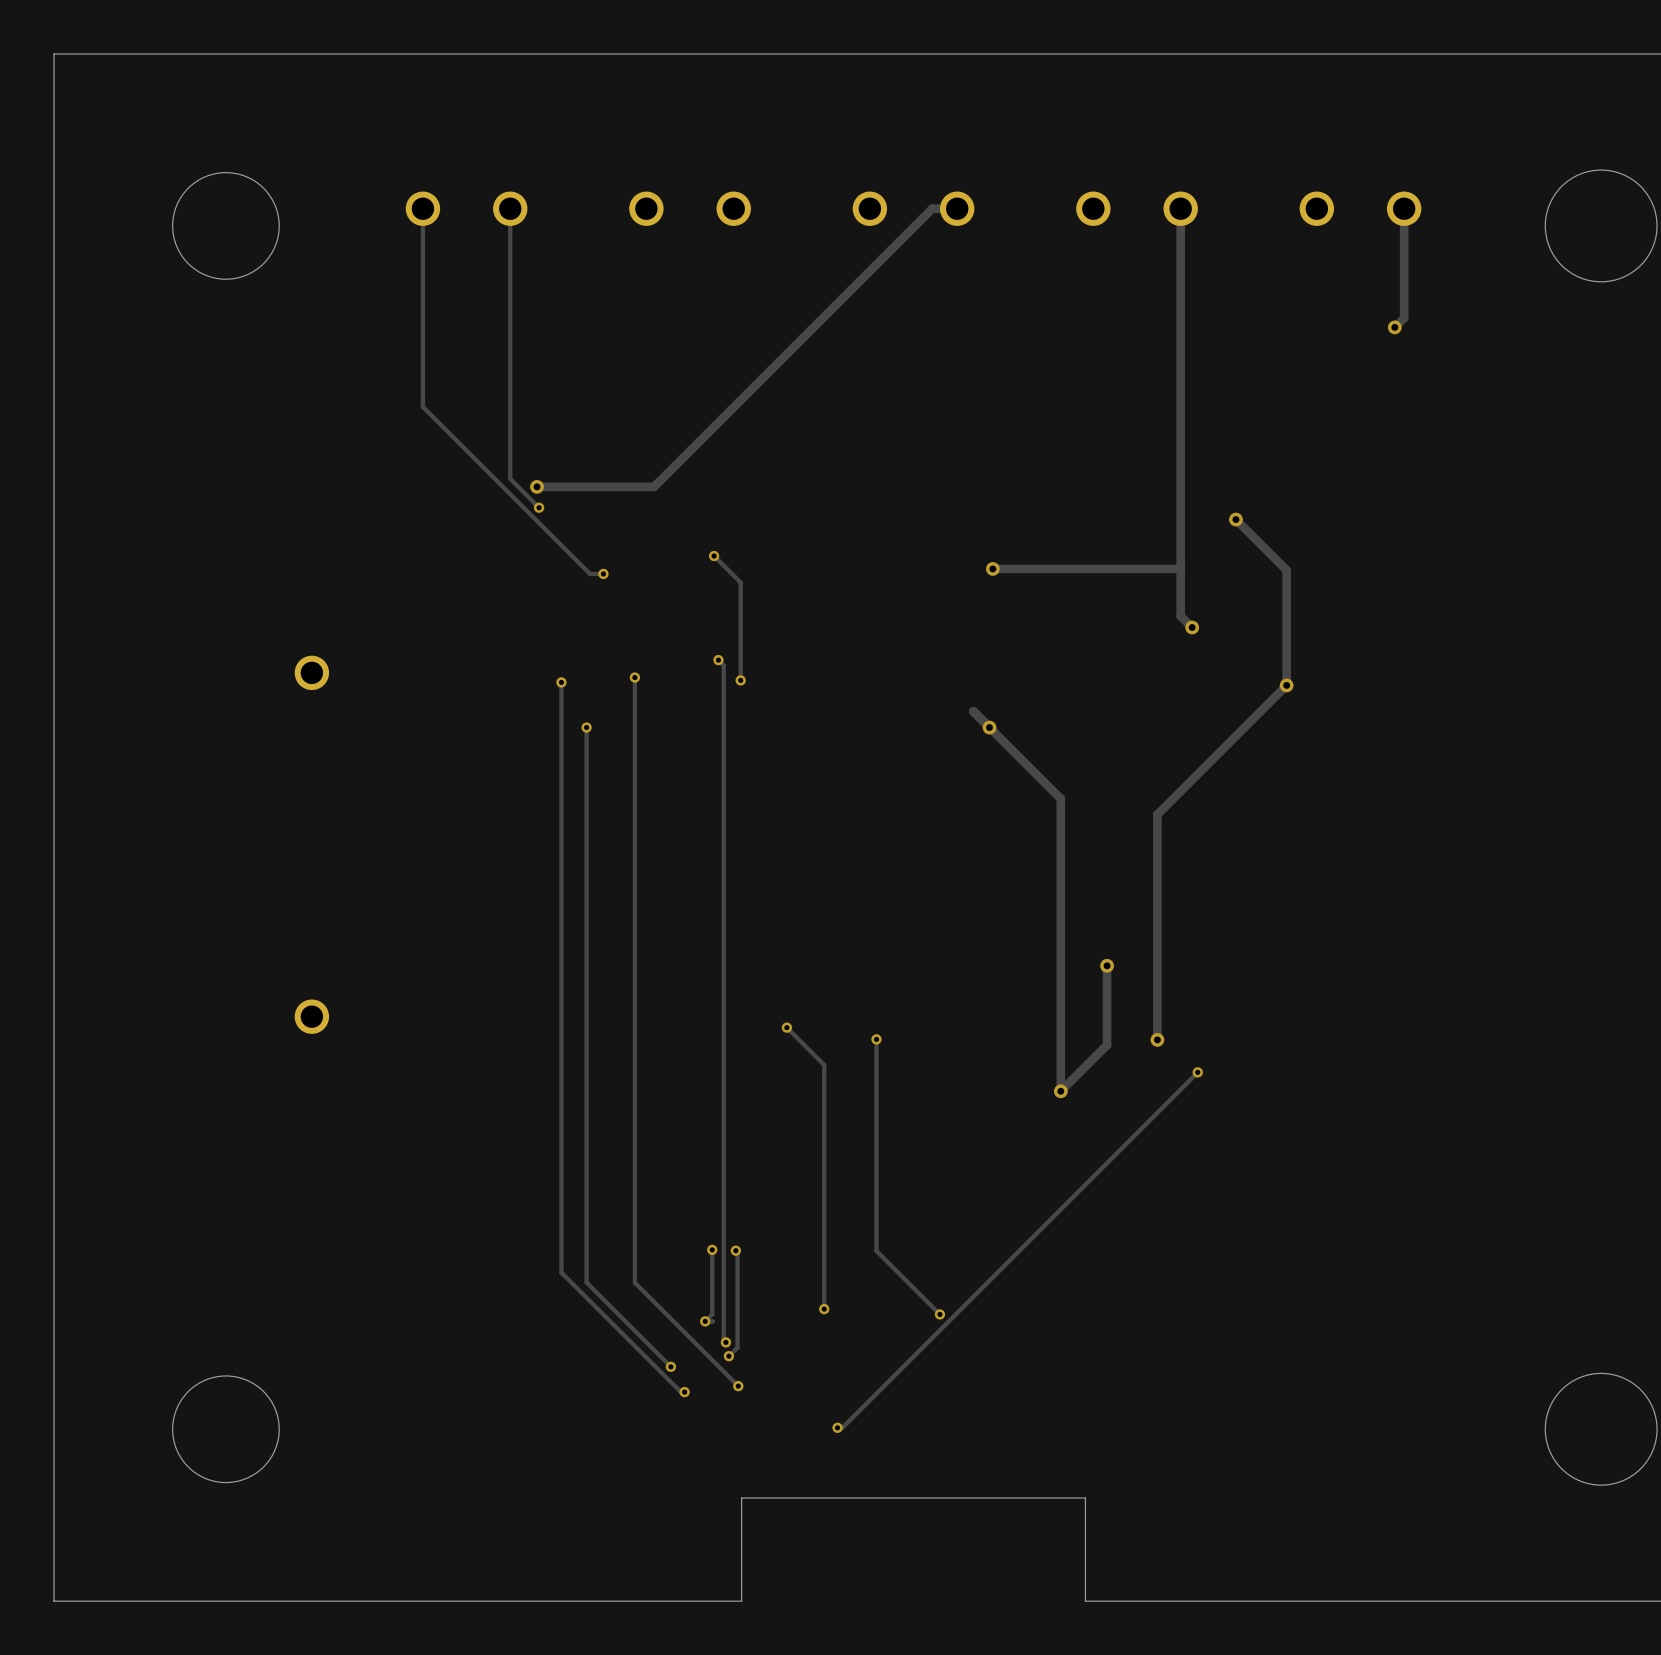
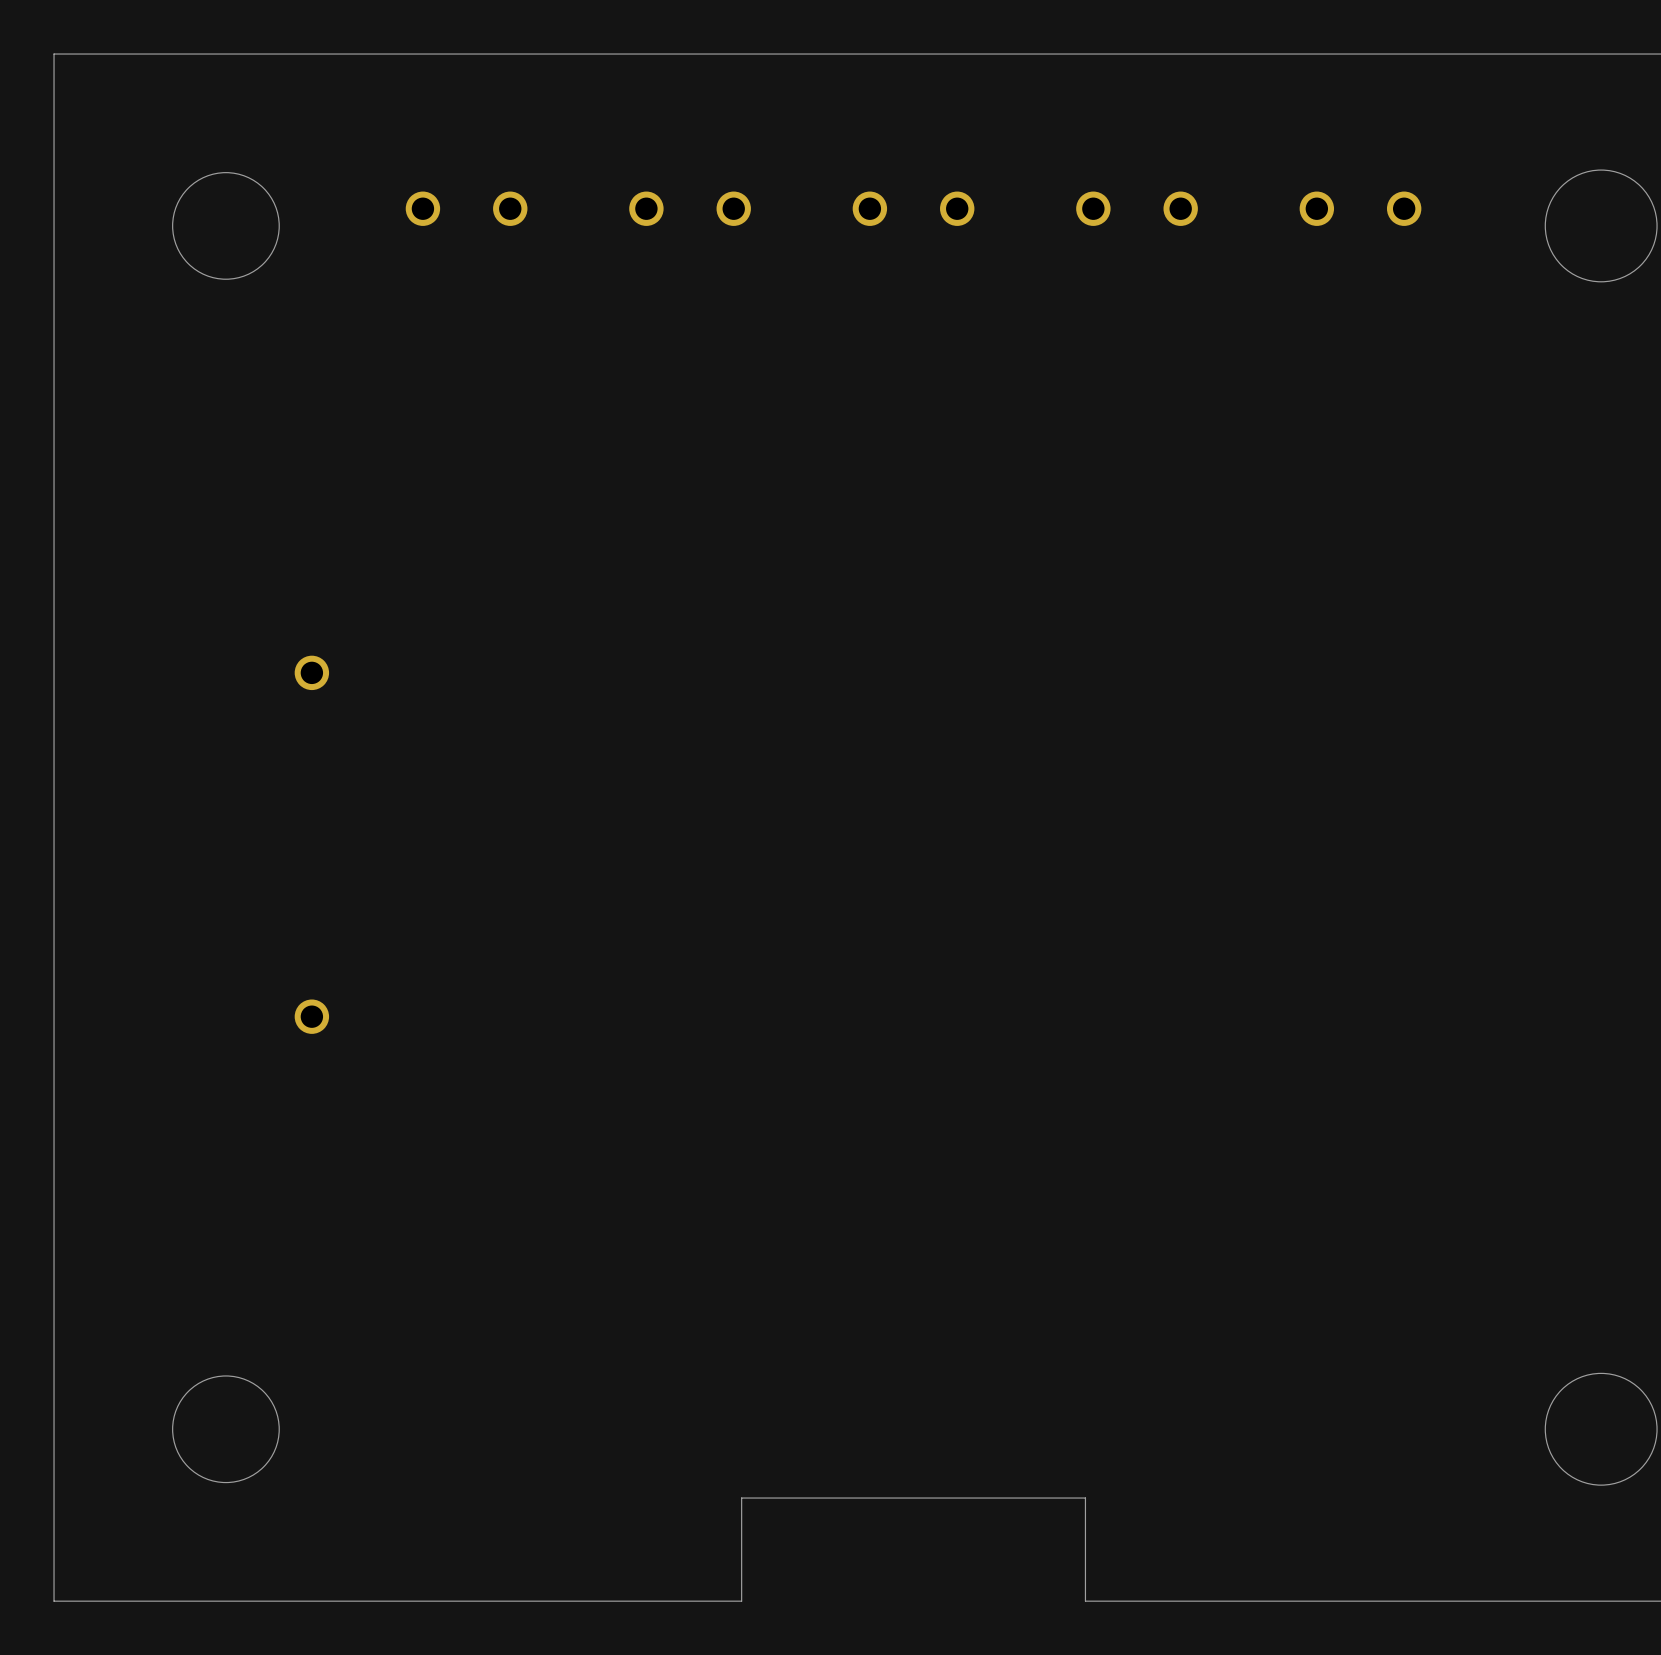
track: (422, 208) (422, 406) (590, 573) (603, 573) -> none
track: (510, 208) (510, 478) (539, 507) -> none
track: (957, 208) (932, 208) (654, 486) (537, 486) -> none
track: (1180, 208) (1180, 616) (1192, 627) -> none
track: (1404, 208) (1404, 318) (1394, 327) -> none
via: (1394, 327) -> none
via: (537, 486) -> none
via: (539, 507) -> none
track: (1235, 519) (1286, 570) (1286, 685) (1157, 814) (1157, 1039) -> none
via: (1235, 519) -> none
track: (714, 556) (740, 582) (740, 680) -> none
via: (714, 556) -> none
via: (992, 568) -> none
track: (1180, 568) (992, 568) -> none
via: (603, 573) -> none
via: (1192, 627) -> none
track: (718, 660) (723, 665) (723, 1340) (726, 1342) -> none
via: (718, 660) -> none
track: (634, 677) (634, 1282) (738, 1386) -> none
via: (634, 677) -> none
via: (740, 680) -> none
track: (561, 682) (561, 1272) (680, 1392) (684, 1392) -> none
via: (561, 682) -> none
via: (1286, 685) -> none
track: (973, 711) (1060, 798) (1060, 1091) (1107, 1045) (1107, 965) -> none
track: (586, 727) (586, 1282) (670, 1366) -> none
via: (586, 727) -> none
via: (989, 727) -> none
via: (1107, 965) -> none
track: (786, 1027) (824, 1065) (824, 1309) -> none
via: (786, 1027) -> none
track: (876, 1039) (876, 1251) (939, 1314) -> none
via: (876, 1039) -> none
via: (1157, 1039) -> none
track: (1197, 1072) (842, 1427) (837, 1427) -> none
via: (1197, 1072) -> none
via: (1060, 1091) -> none
track: (712, 1249) (712, 1314) (705, 1321) (712, 1321) -> none
via: (712, 1249) -> none
track: (735, 1250) (737, 1252) (737, 1347) (728, 1356) -> none
via: (735, 1250) -> none
via: (824, 1309) -> none
via: (939, 1314) -> none
via: (705, 1321) -> none
via: (725, 1342) -> none
via: (728, 1356) -> none
via: (670, 1366) -> none
via: (738, 1386) -> none
via: (684, 1392) -> none
via: (837, 1427) -> none

